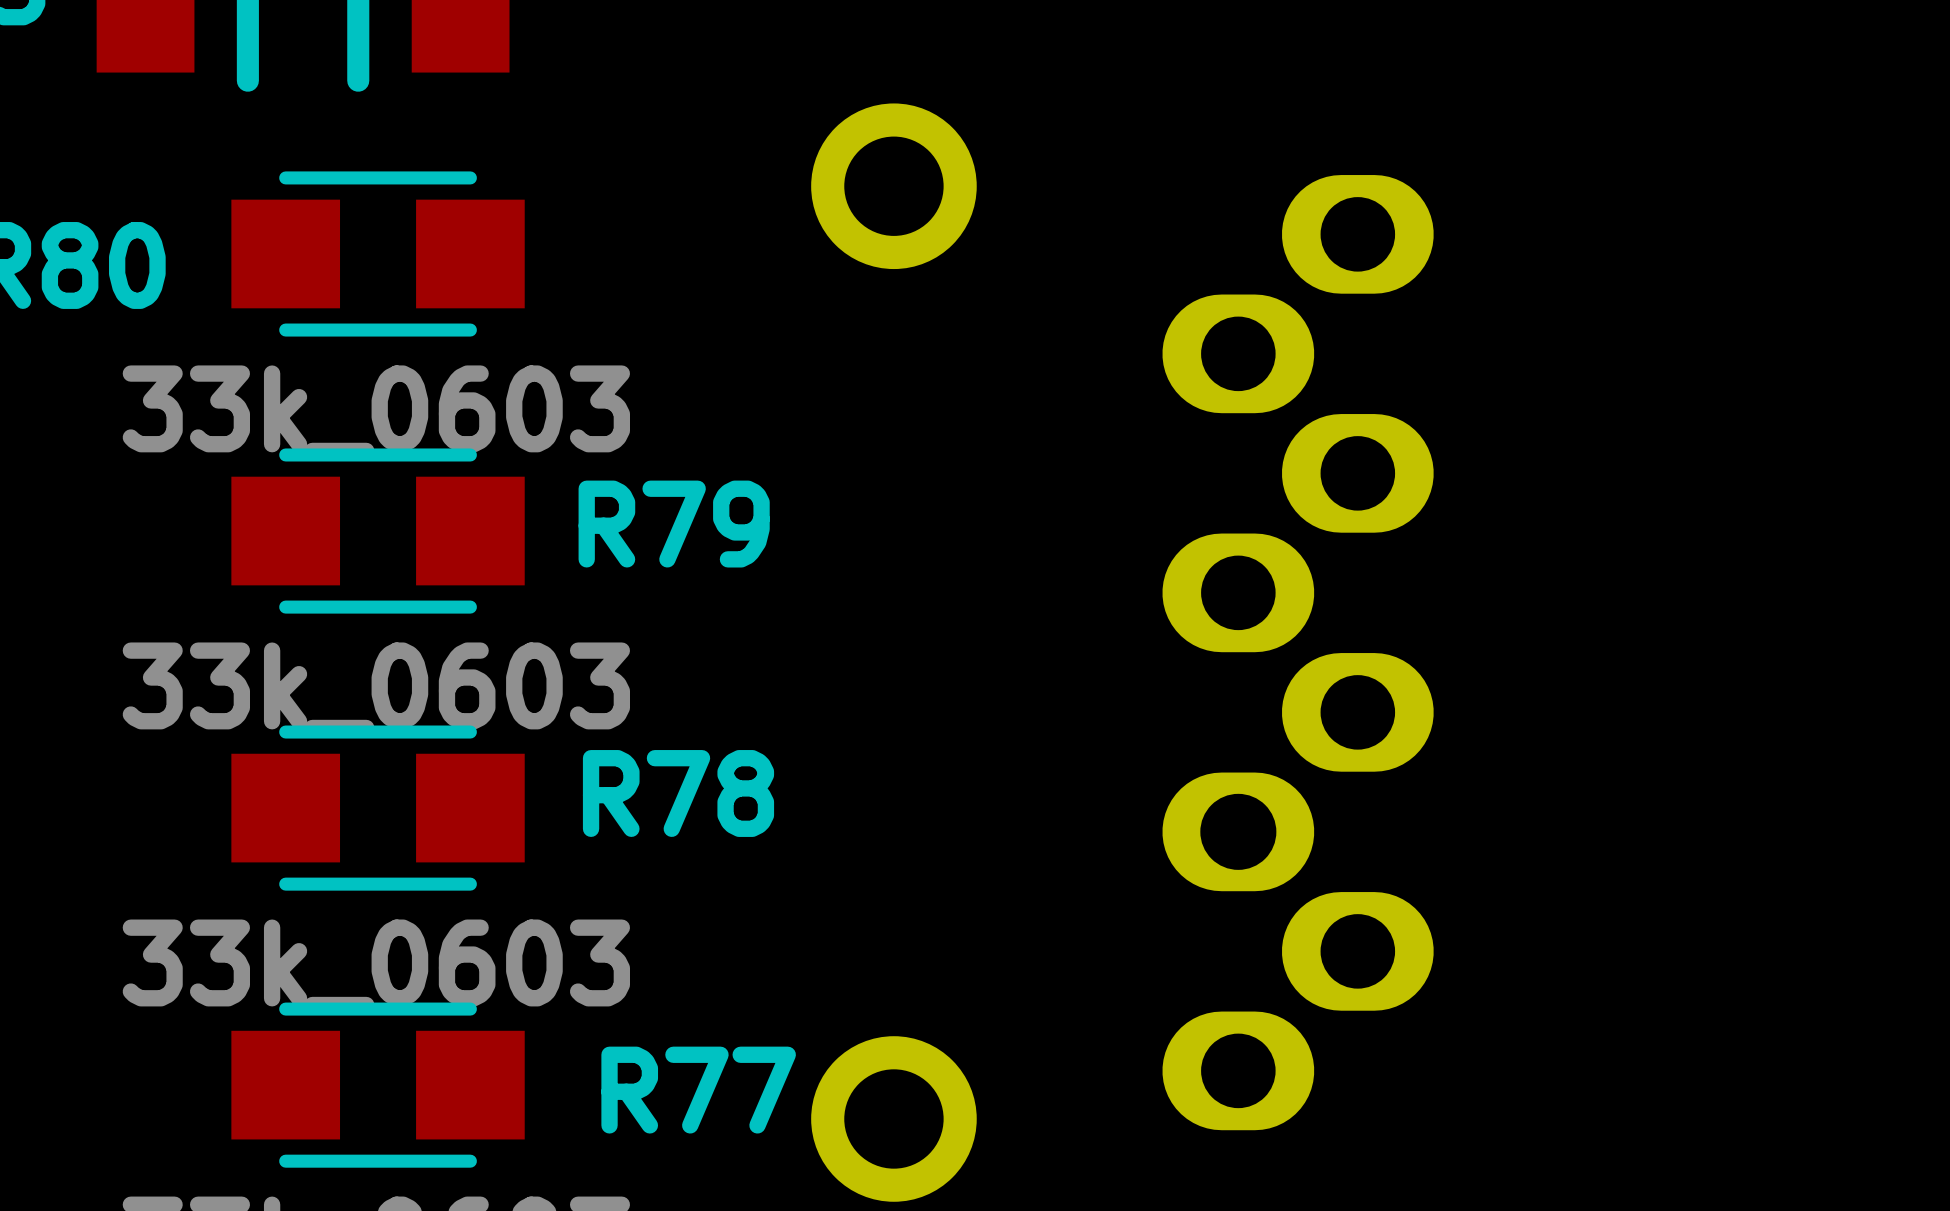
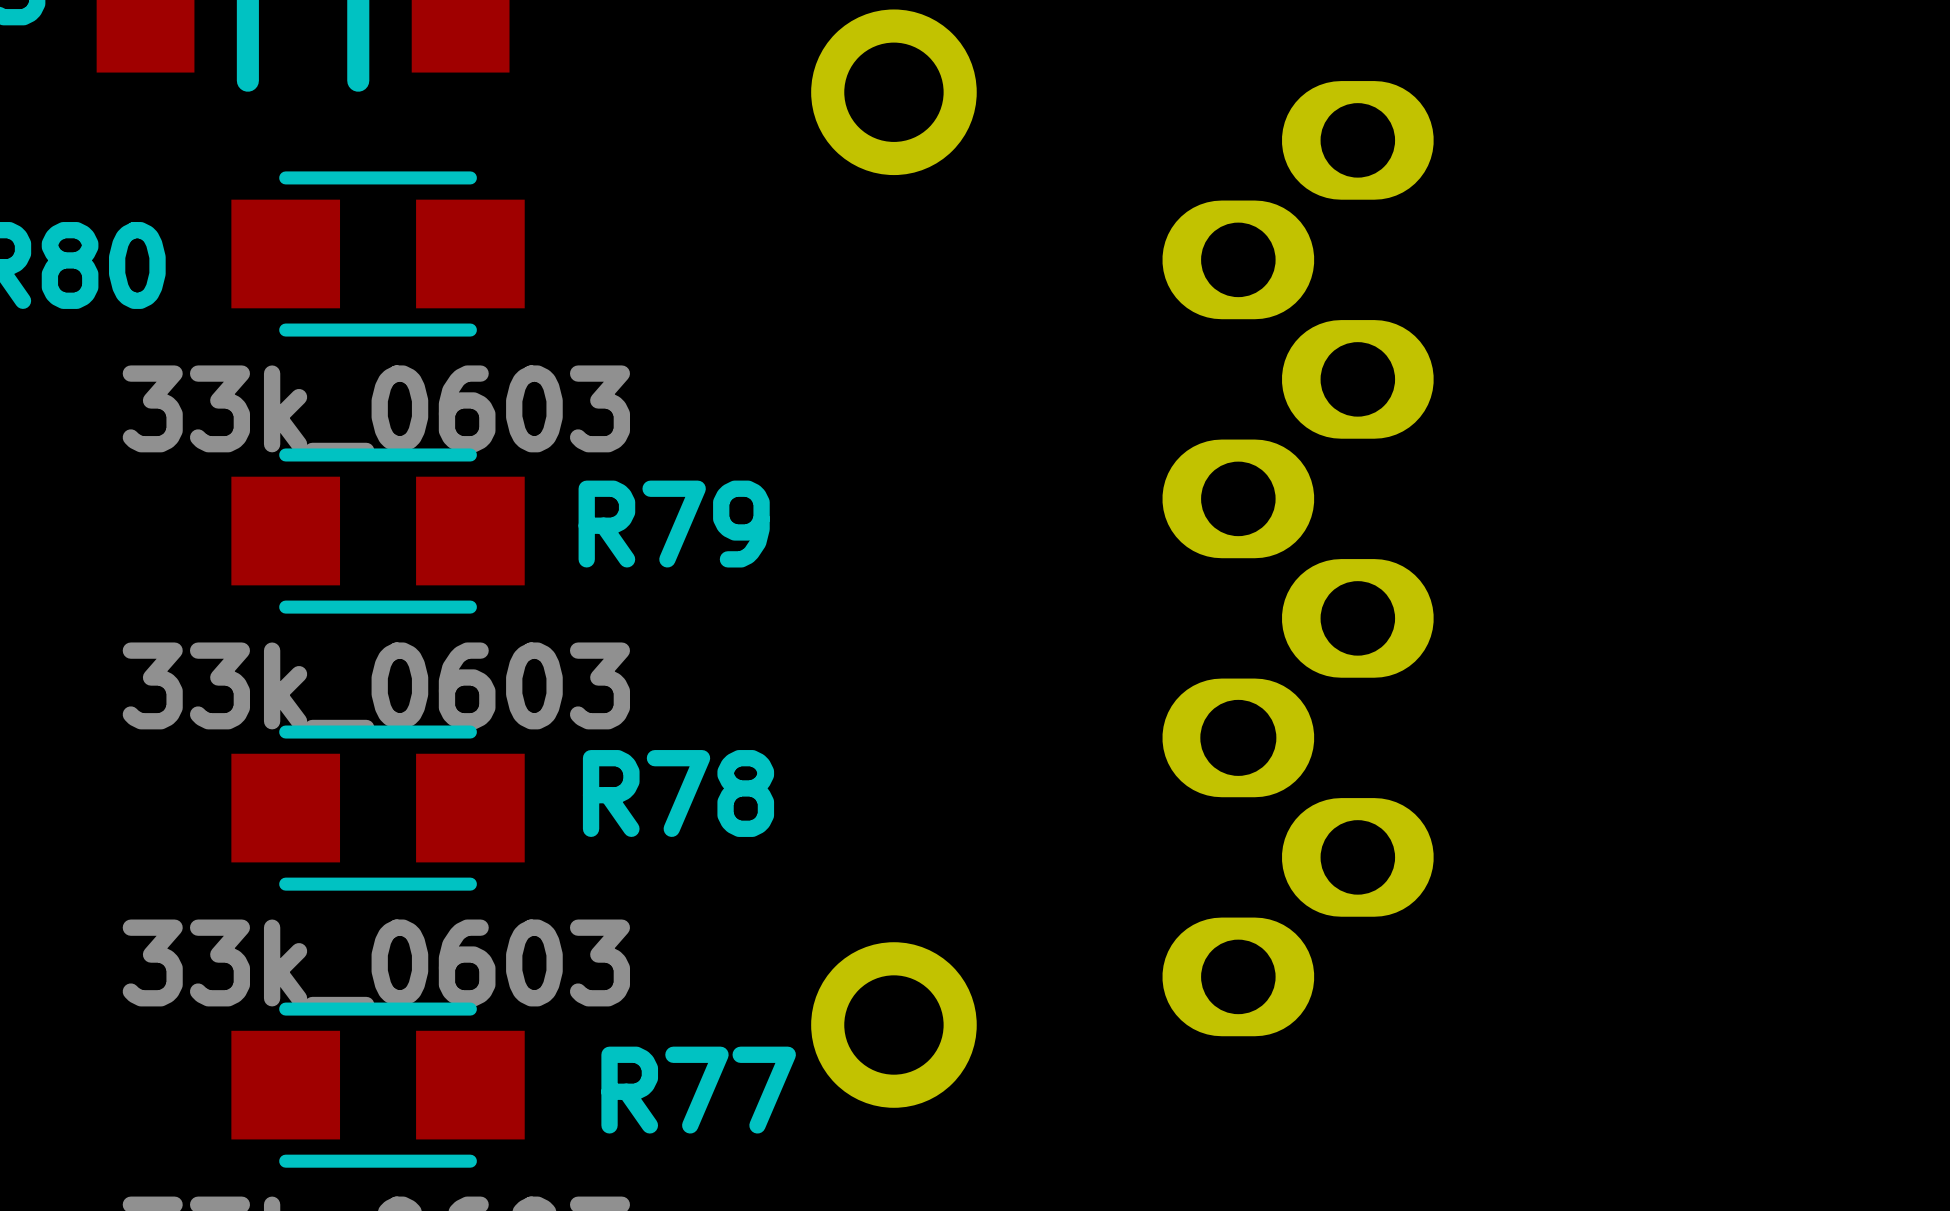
part position: (1122, 652) -> (1122, 558)

